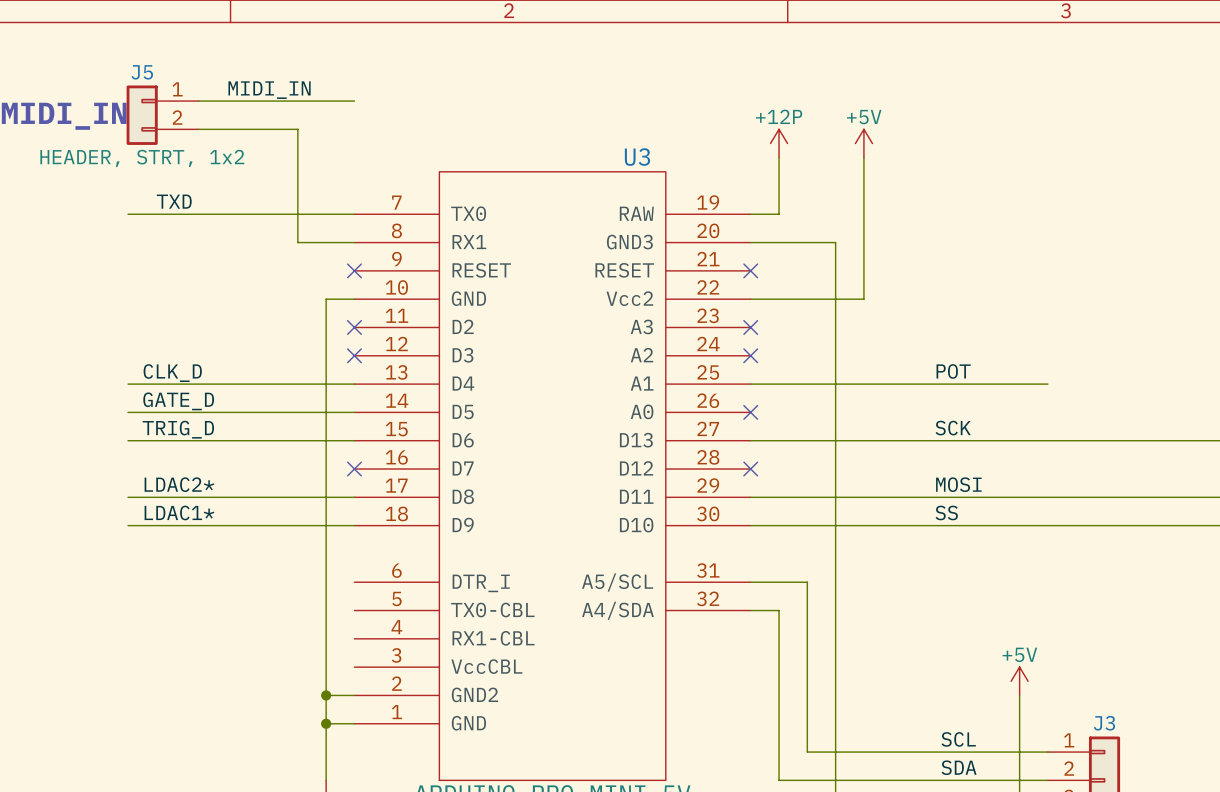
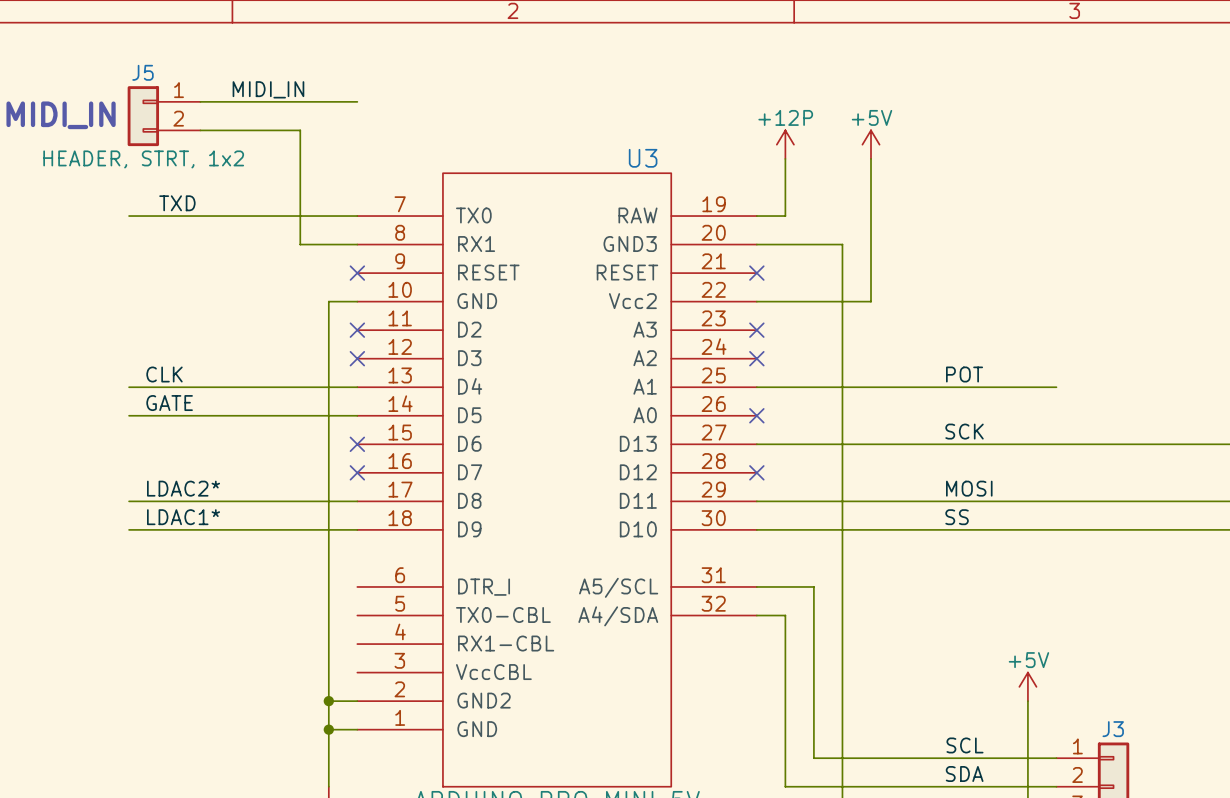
label: CLK_D (172, 373) -> CLK (164, 374)
label: GATE_D (178, 401) -> GATE (169, 403)
label: TRIG_D (178, 429) -> none
wire: (128, 440) (354, 440) -> none
no-connect mark: none -> (357, 444)

